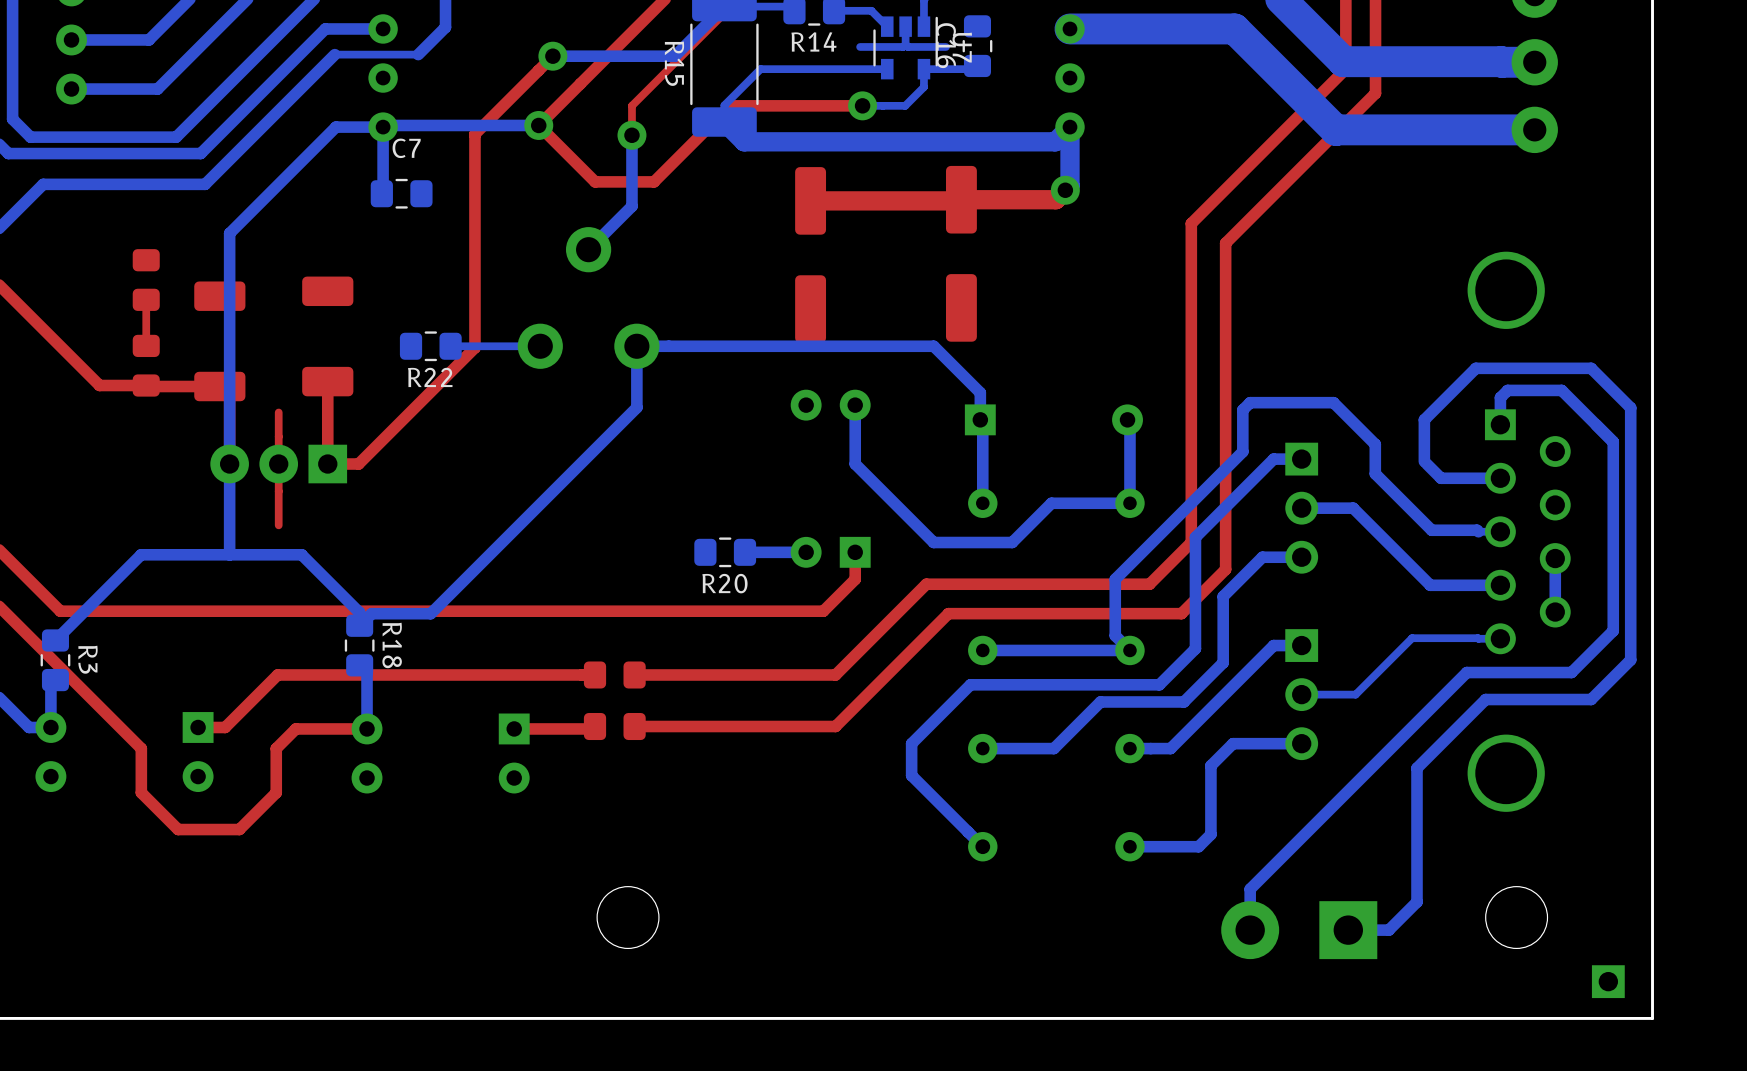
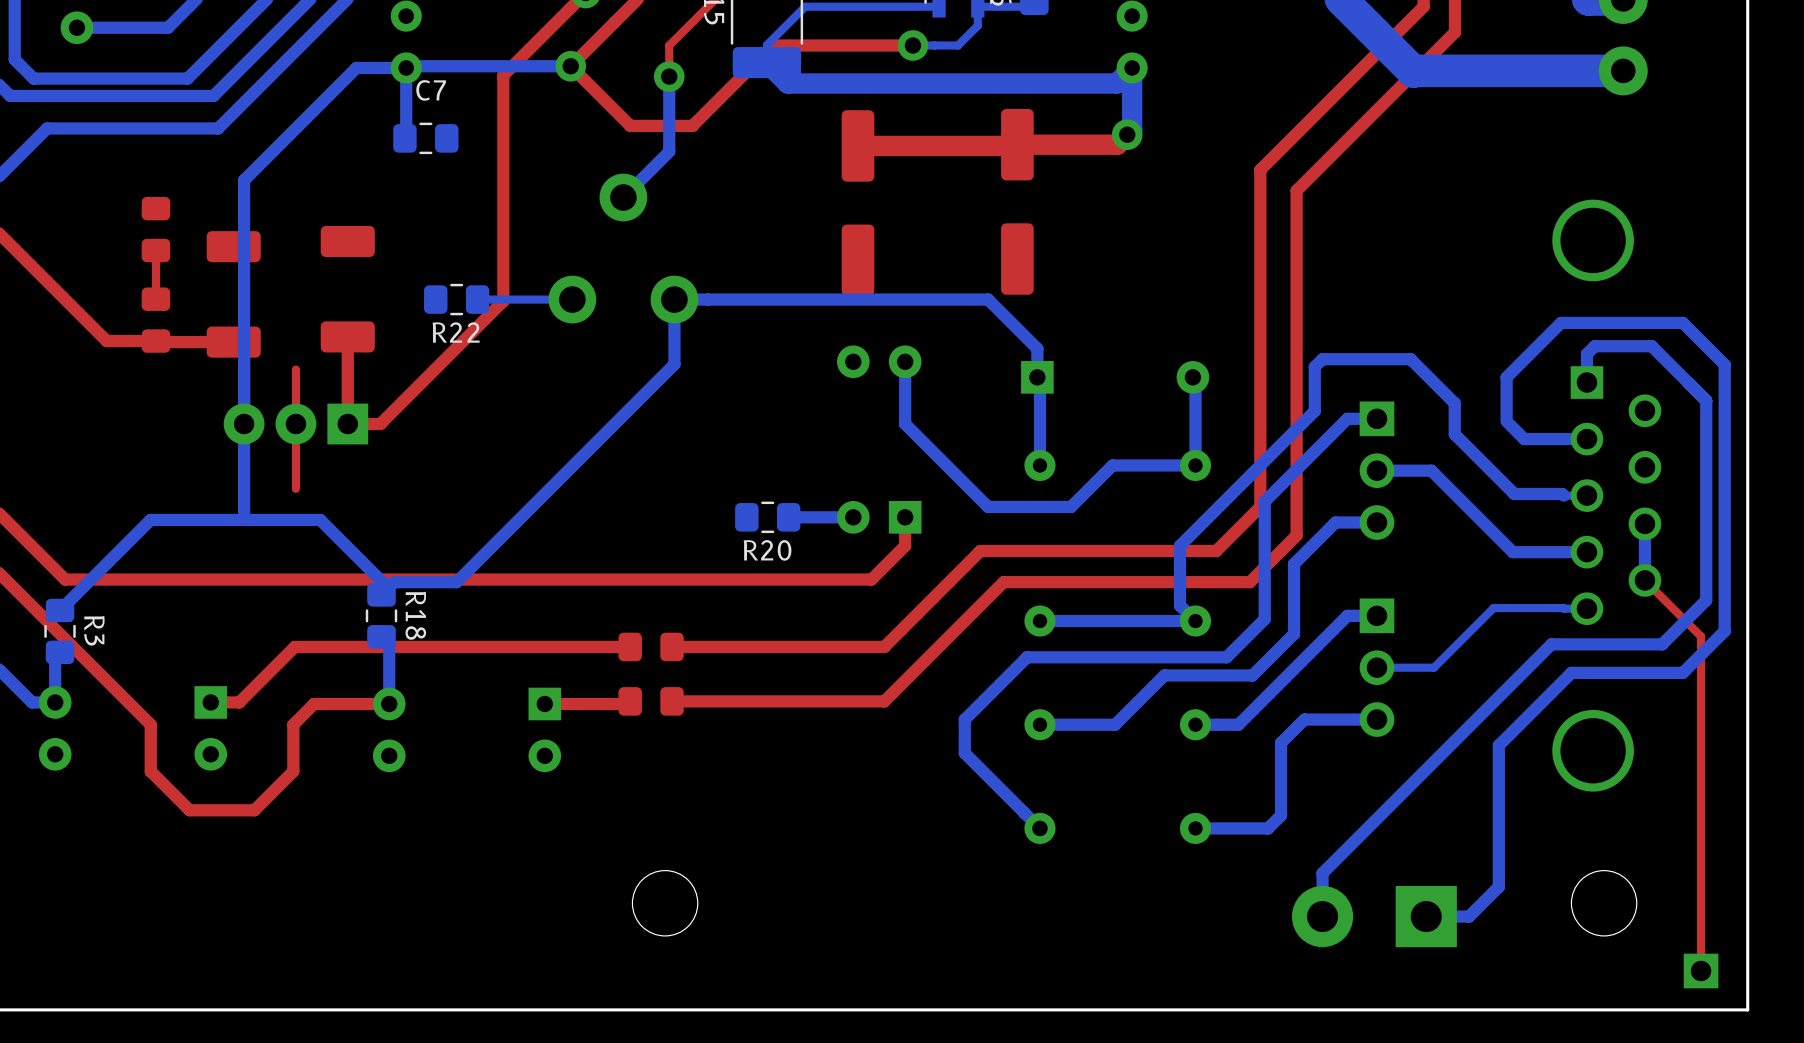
top track: none -> (1644, 580) (1701, 636) (1701, 971)

